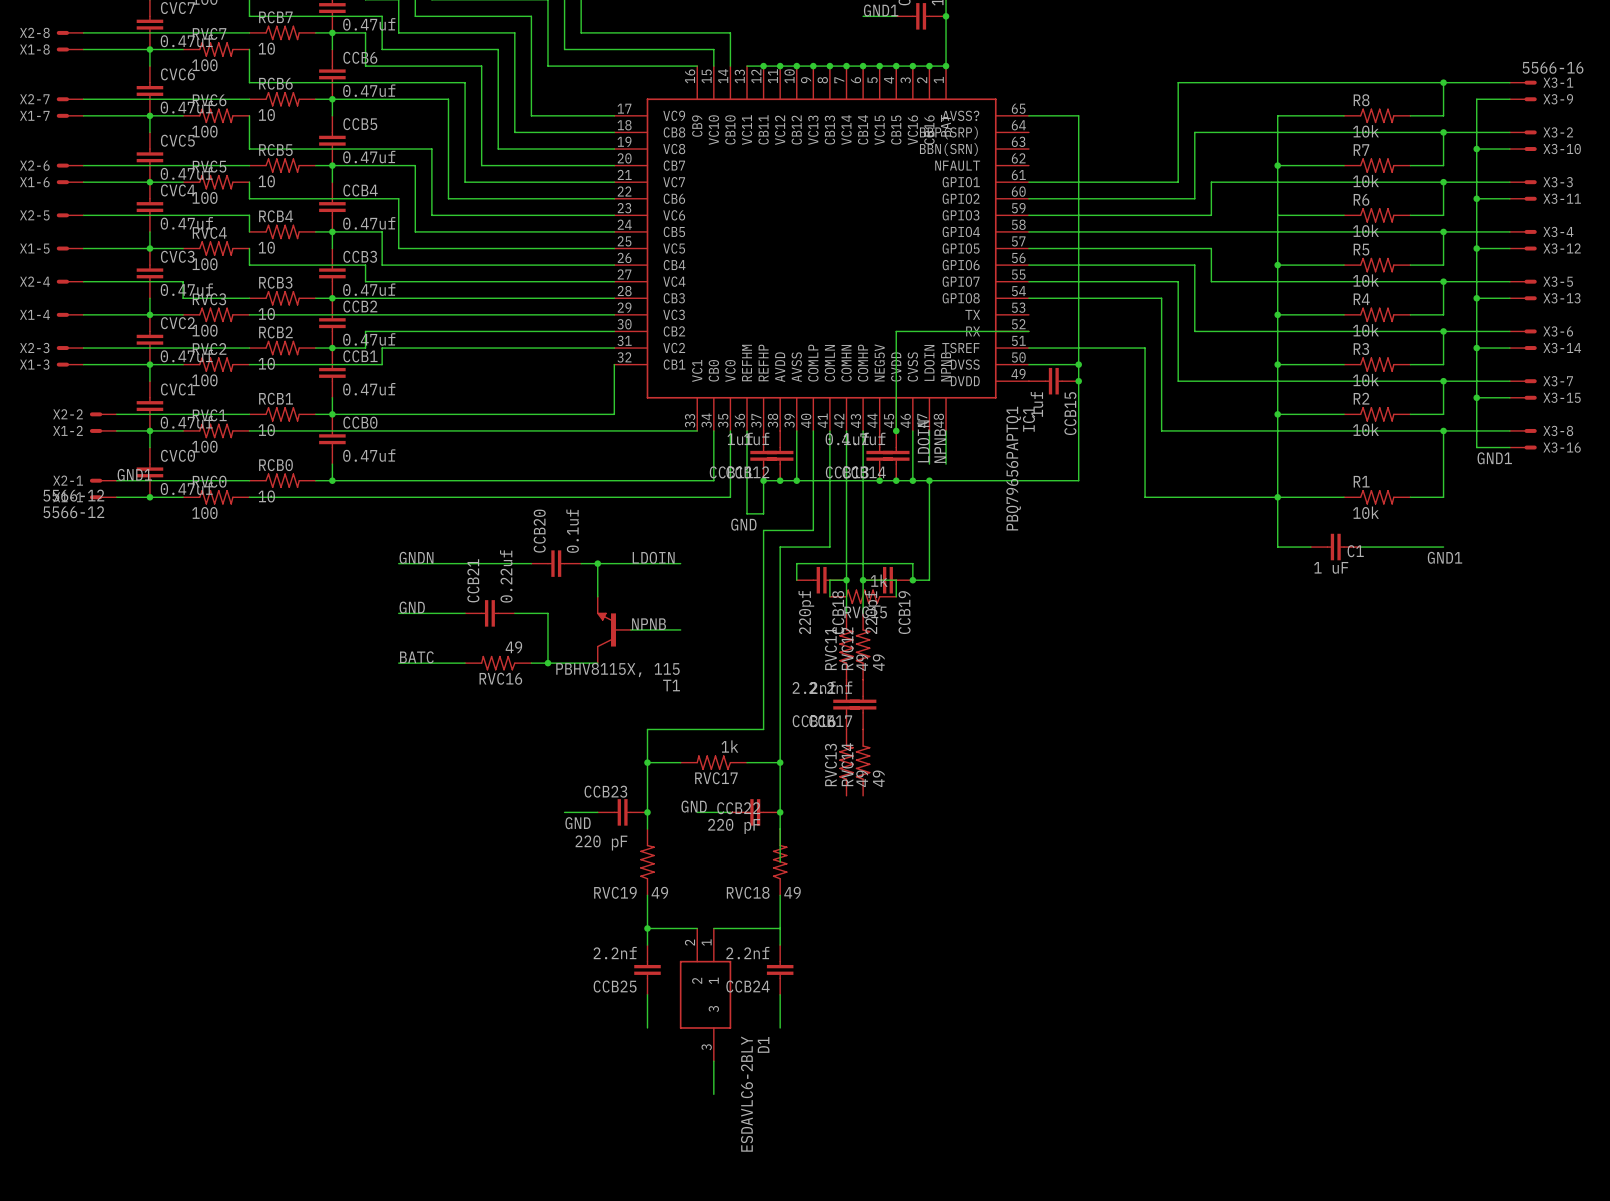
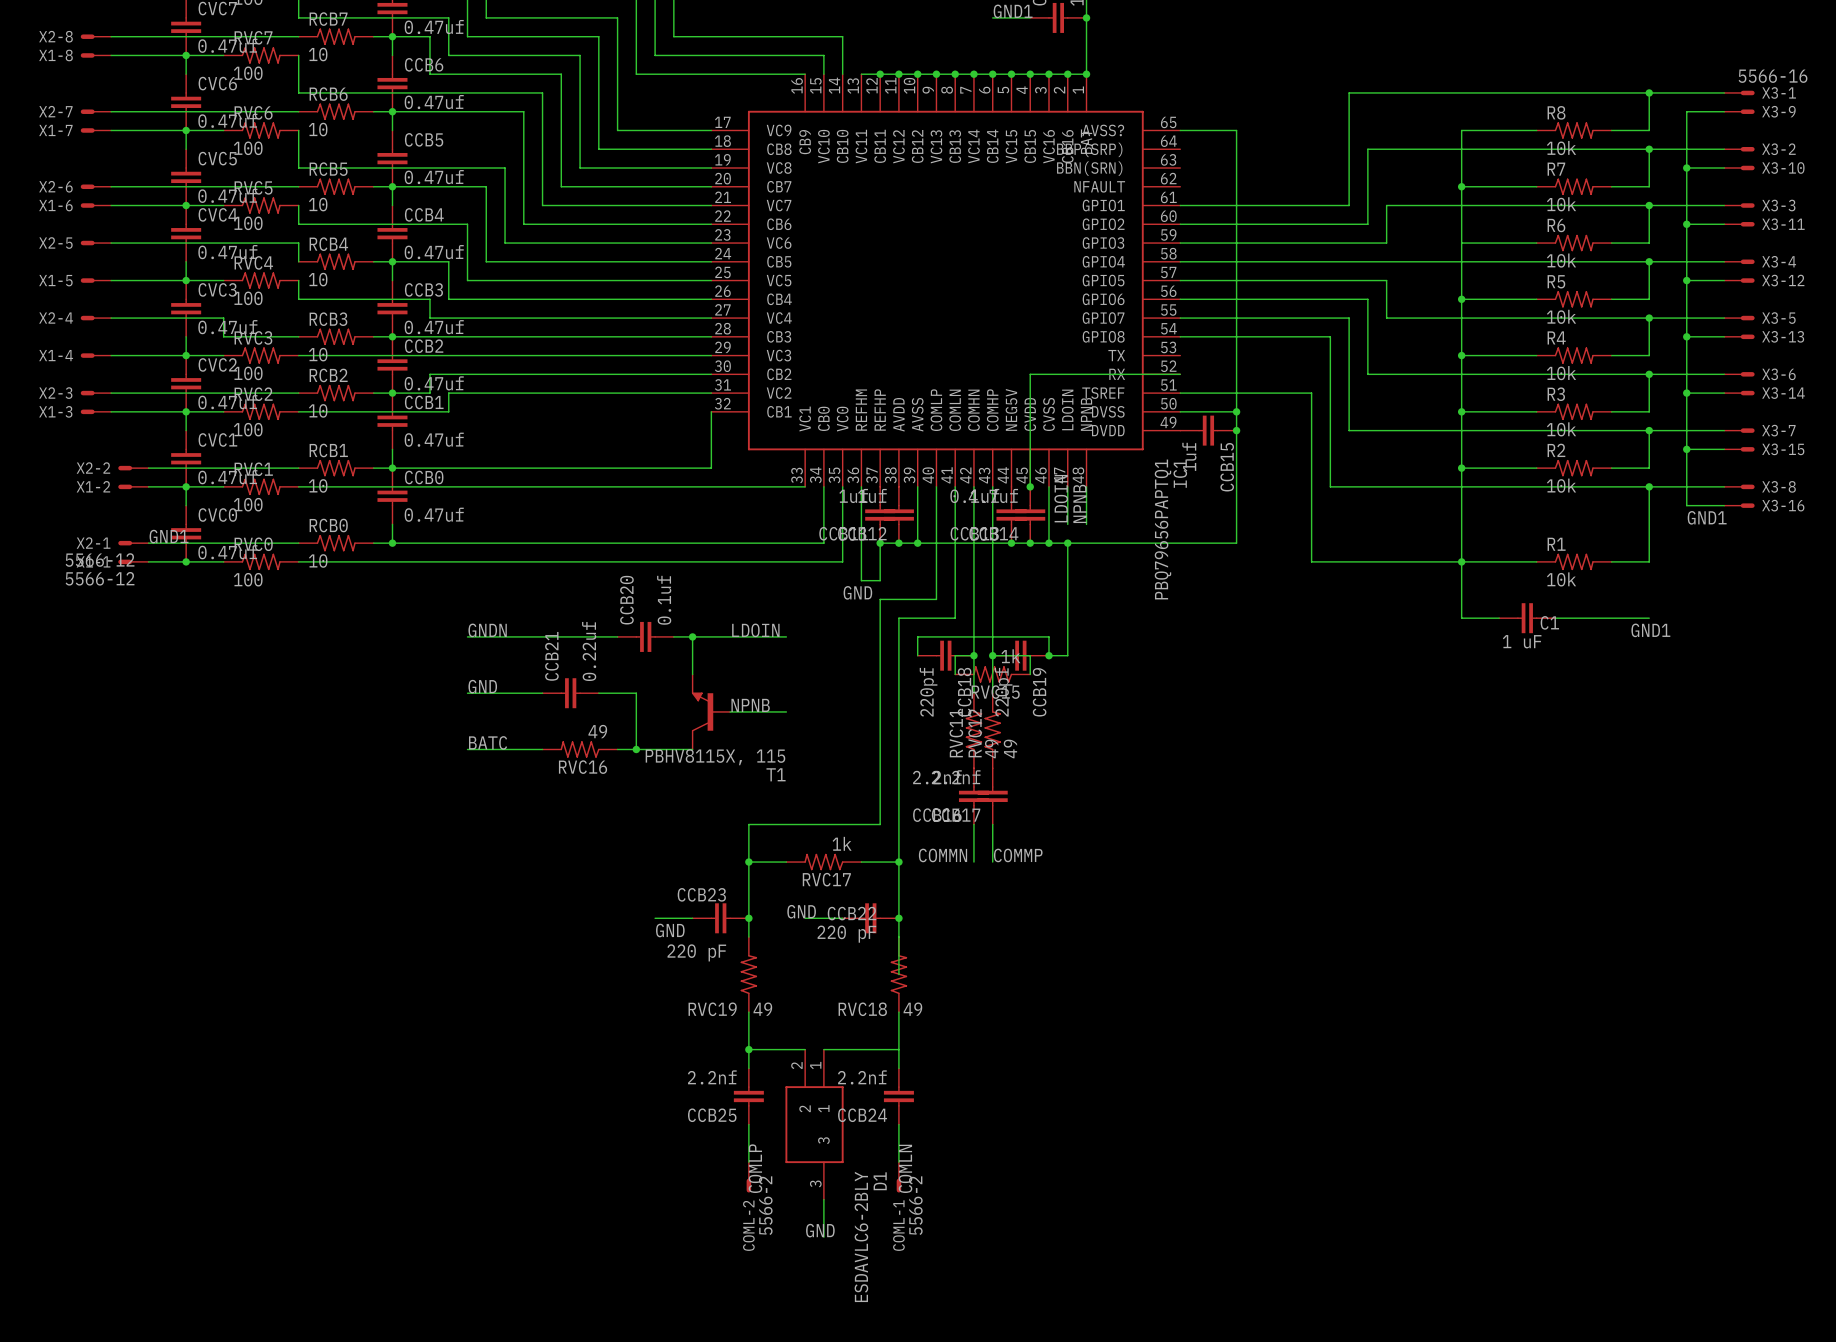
label: none -> COMMN (943, 855)
label: none -> COMMP (1018, 855)
RVC13: 49 (846, 762) -> none
RVC14: 49 (863, 762) -> none
label: none -> COMLP (755, 1168)
label: none -> COMLN (905, 1168)
COML-2: none -> 5566-2 (748, 1177)
COML-1: none -> 5566-2 (898, 1177)
label: none -> GND (820, 1230)

